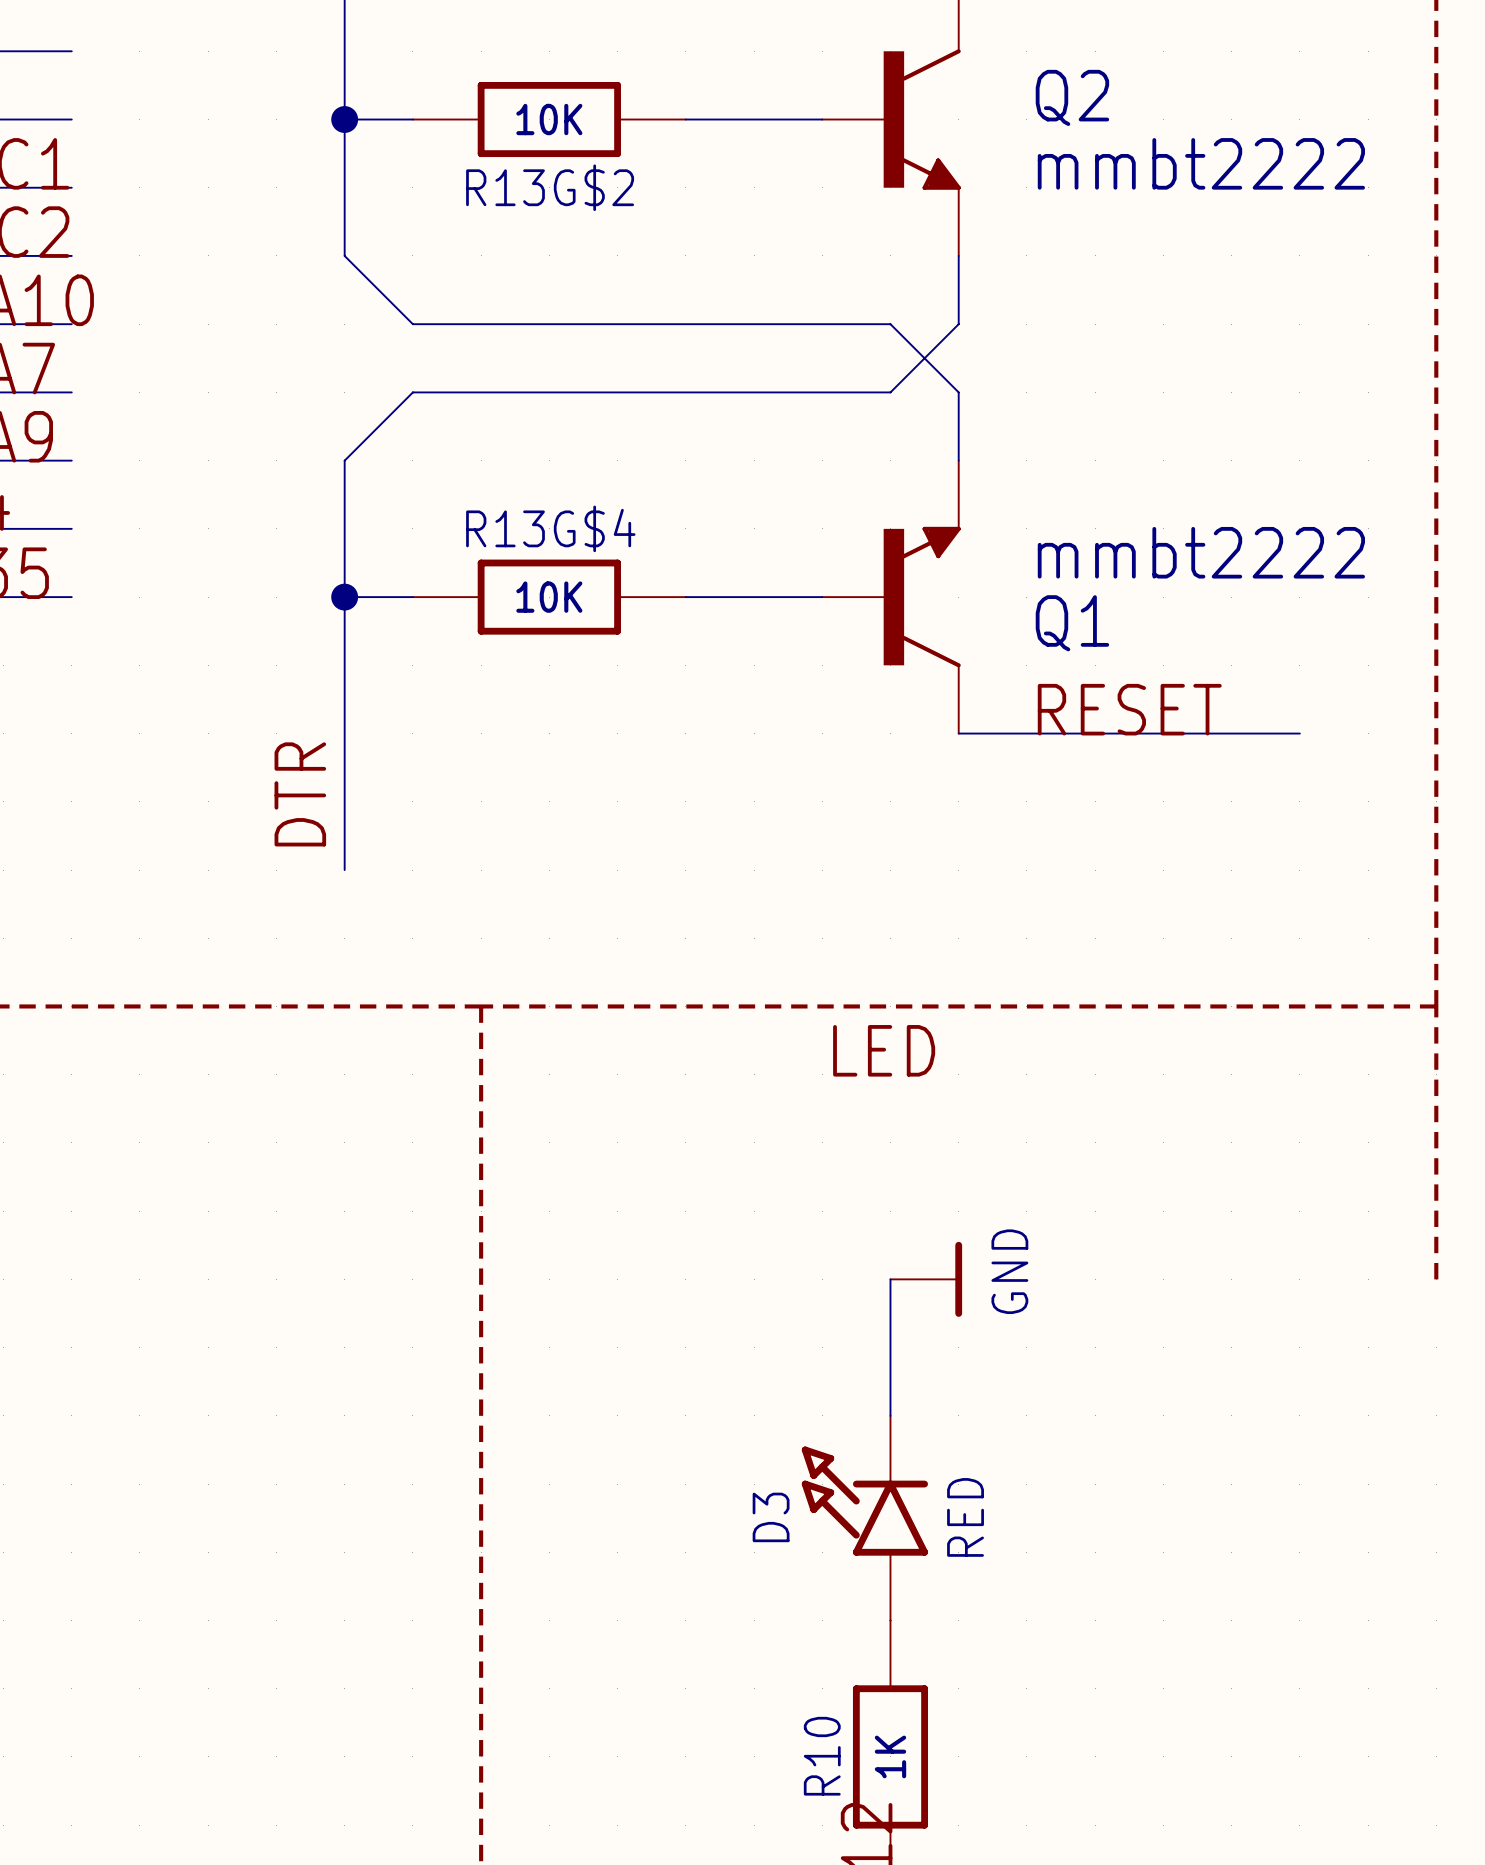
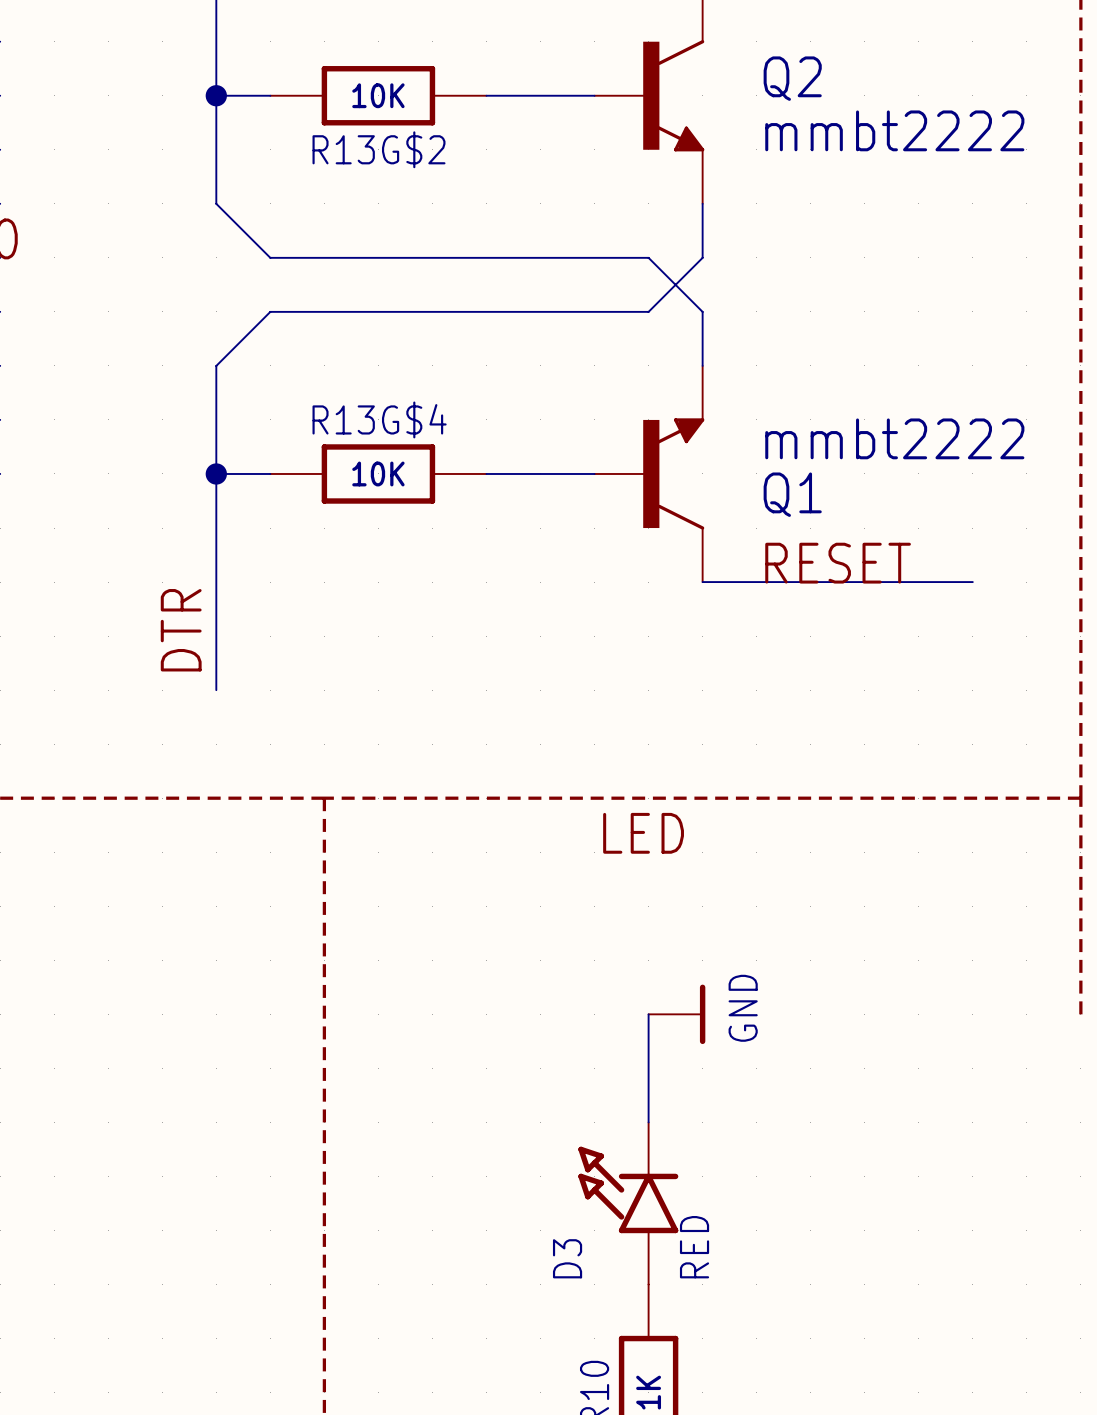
D3 name position: D3 (771, 1517) -> D3 (567, 1258)
D3 value position: RED (965, 1517) -> RED (694, 1247)

